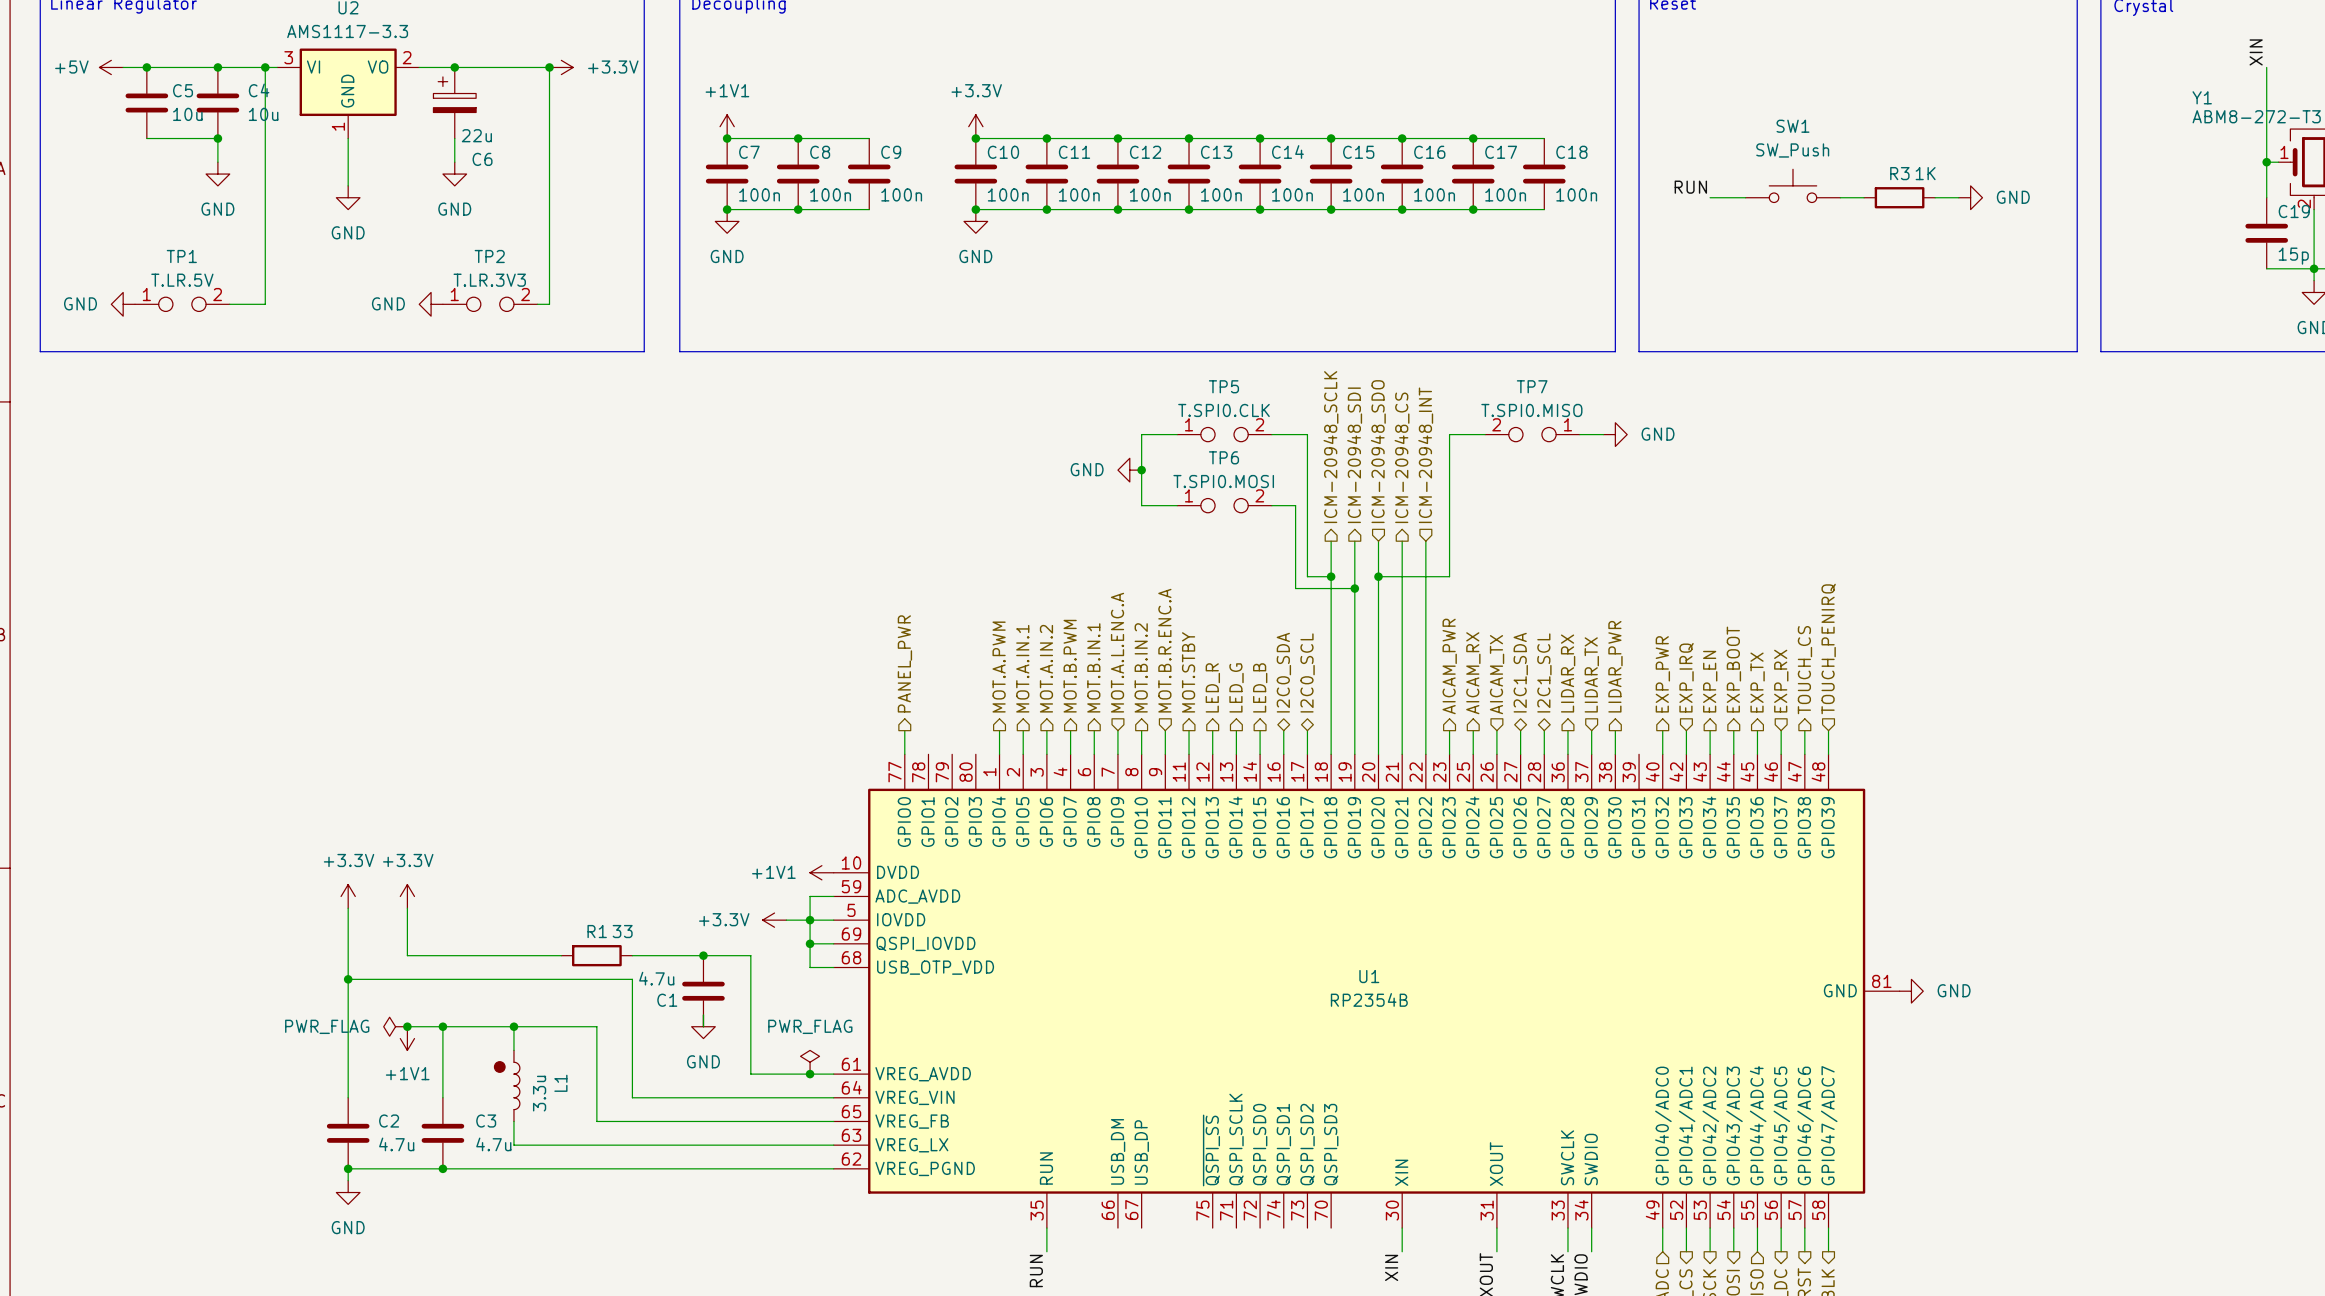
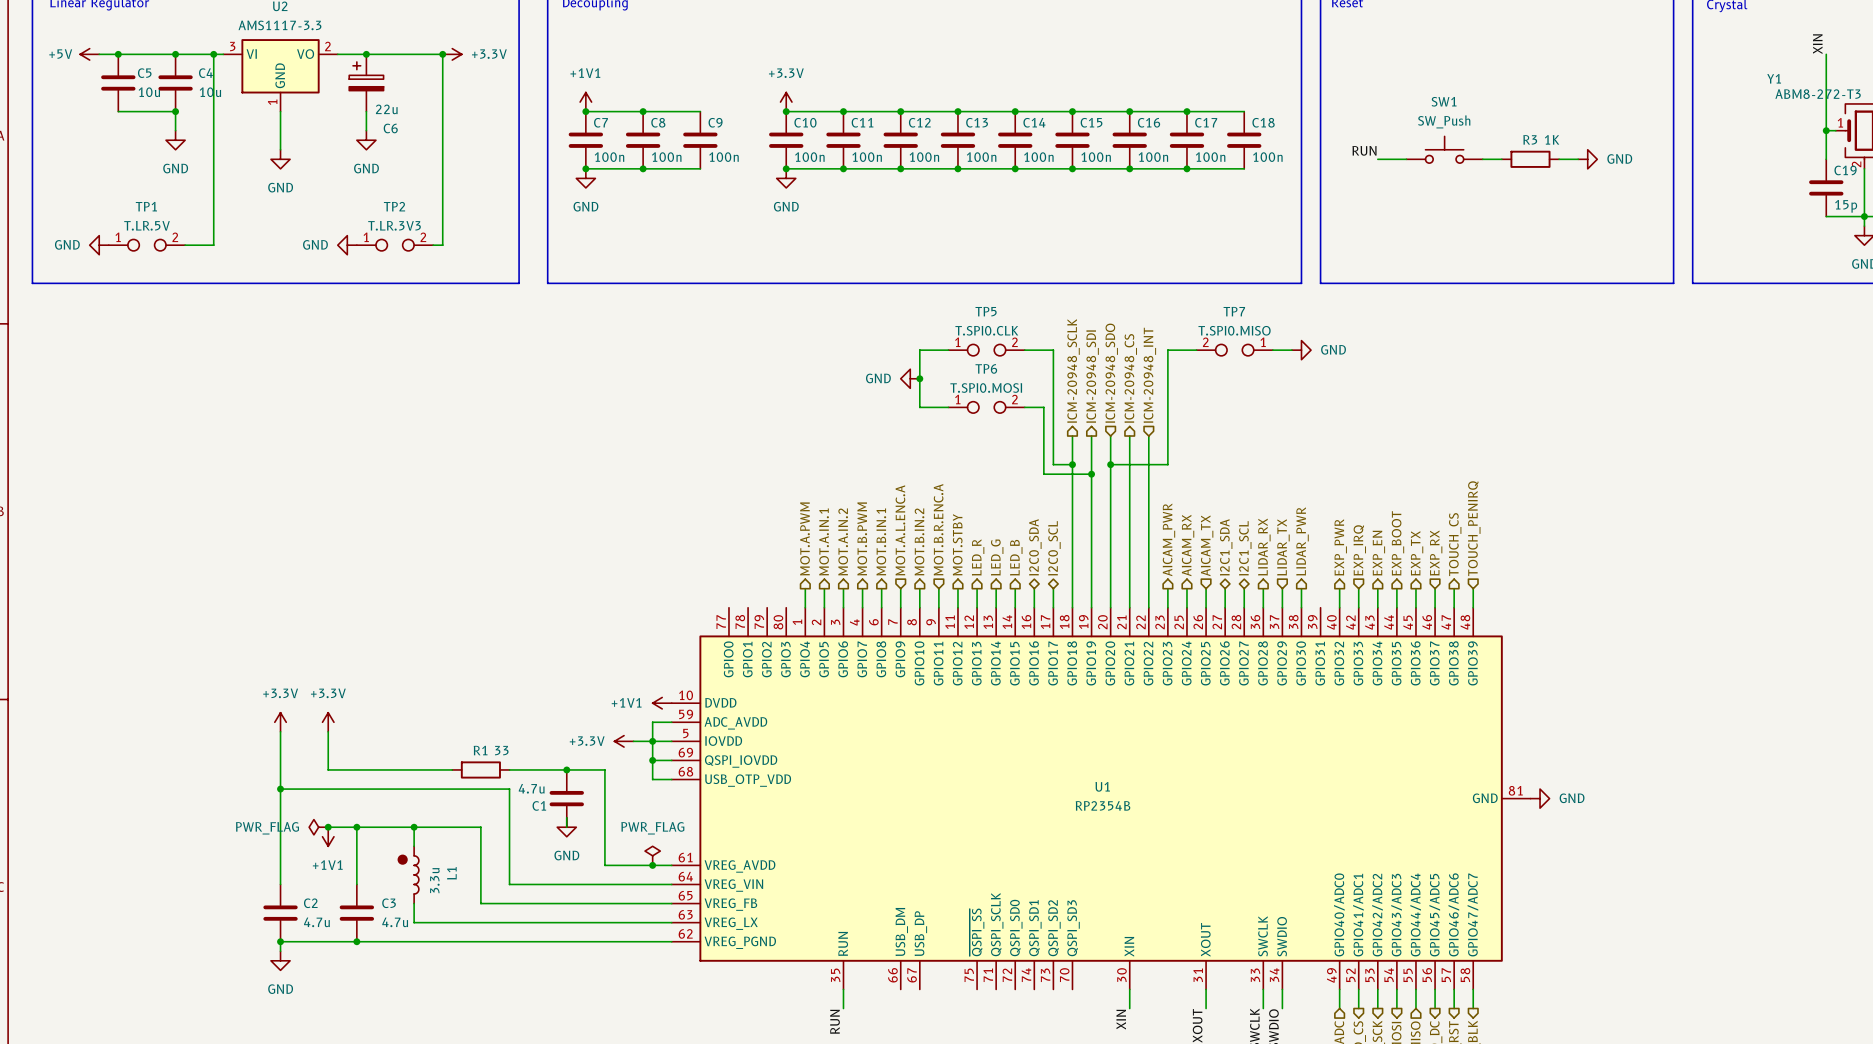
hierarchical label: PANEL_PWR (904, 663) -> none
wire: (904, 730) (904, 754) -> none

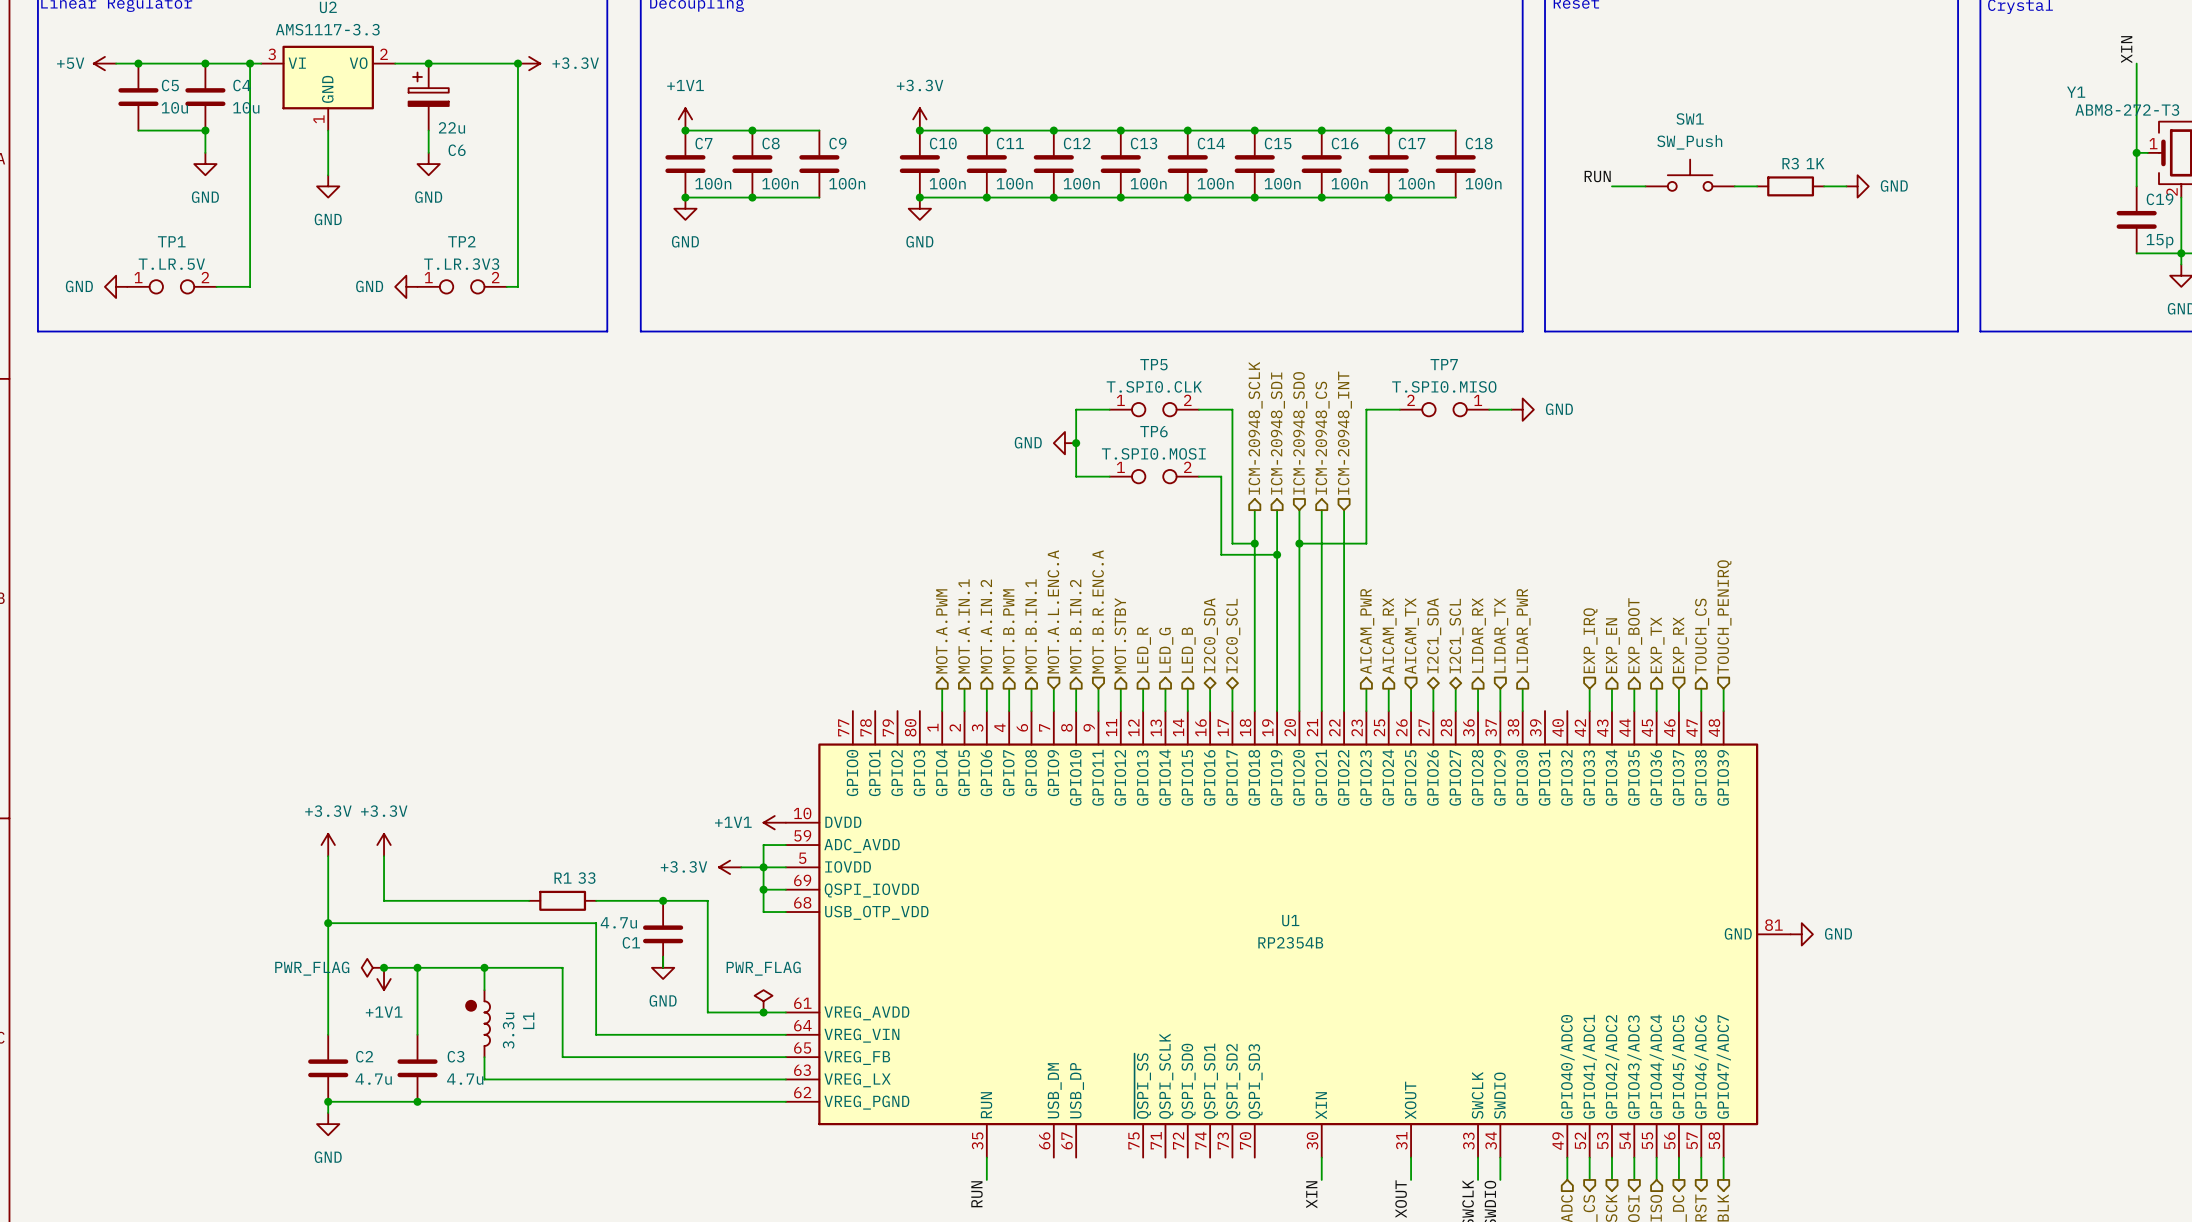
hierarchical label: EXP_PWR (1340, 547) -> none
wire: (1339, 588) (1339, 607) -> none

